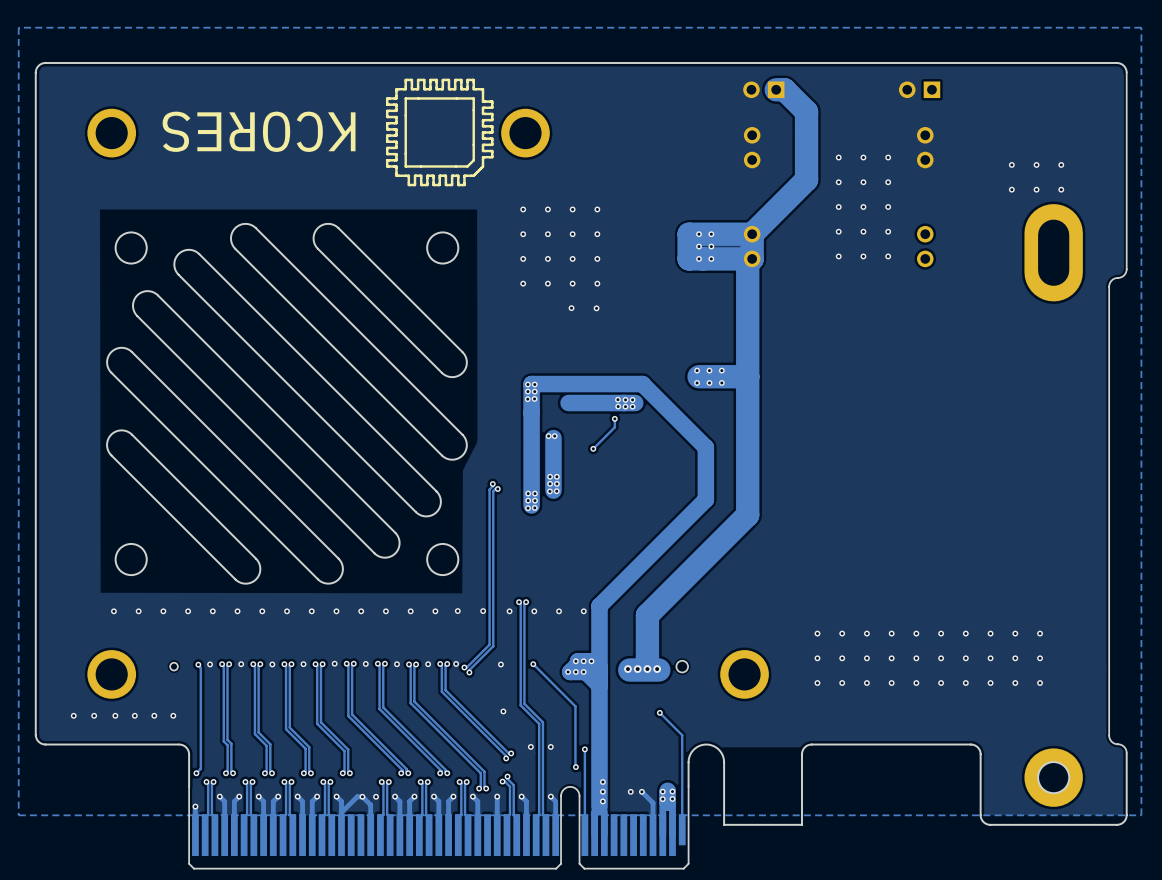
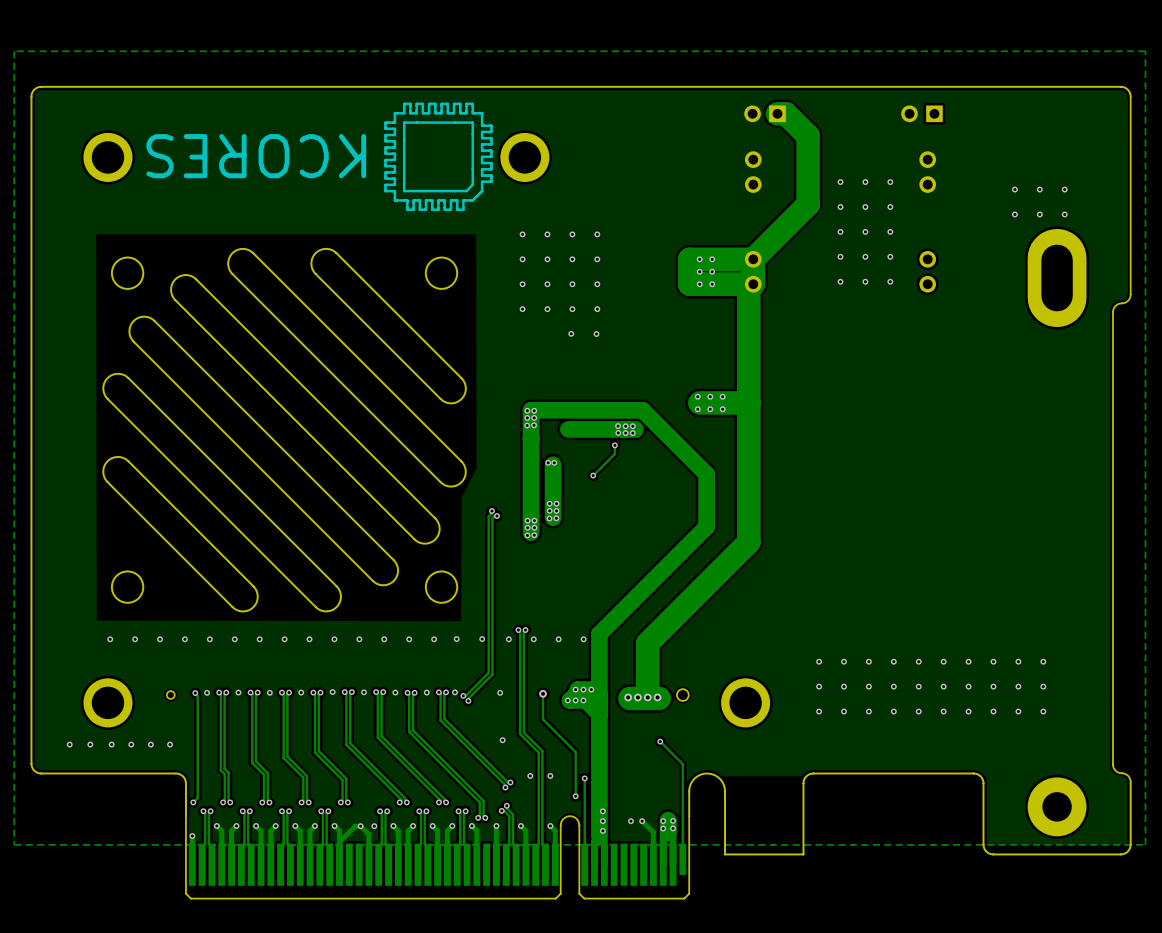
track: (533, 664) (575, 706) (575, 766) -> none
via: (533, 664) -> none
track: none -> (543, 693) (543, 719) (575, 752) (575, 796)
via: none -> (543, 693)

